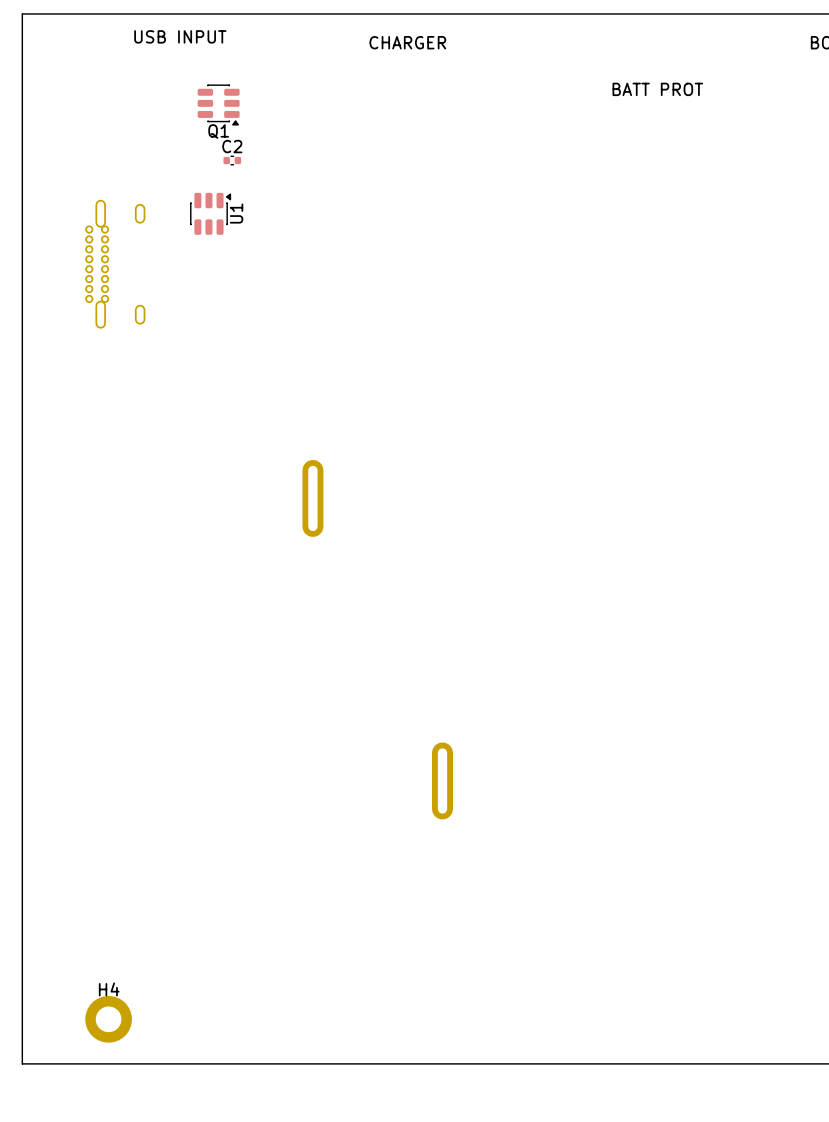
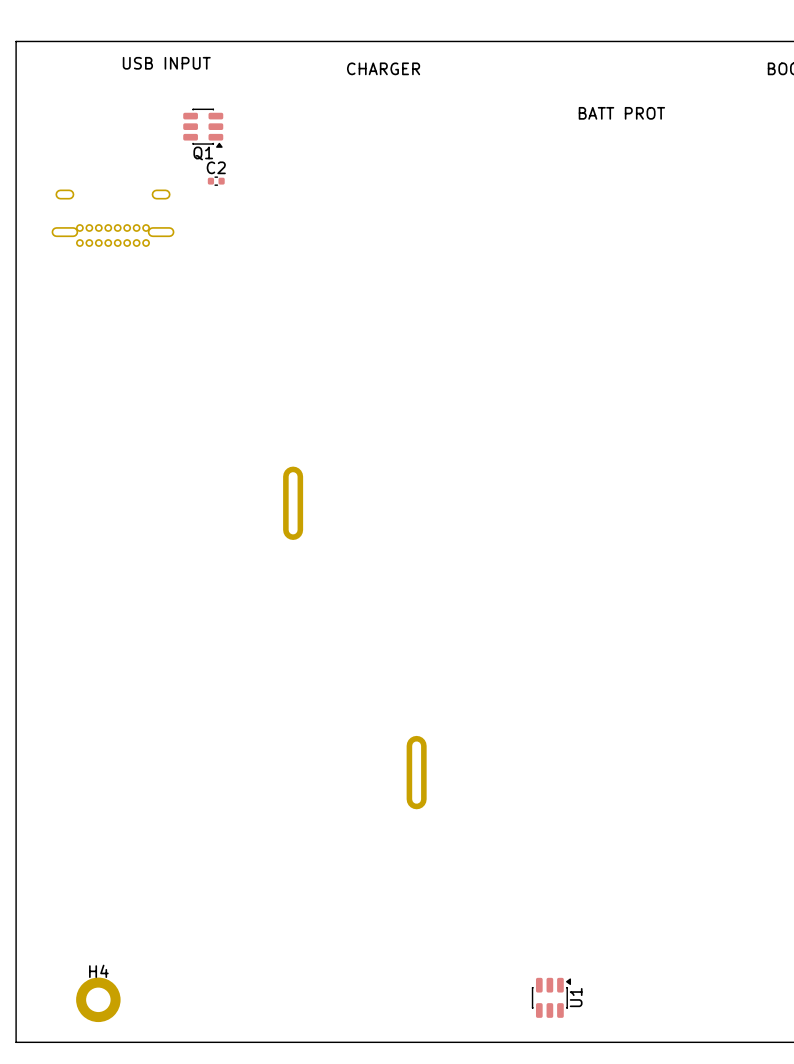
U1 position: (210, 213) -> (551, 997)
part rotation: 0° (115, 264) -> 90° counterclockwise (112, 218)

